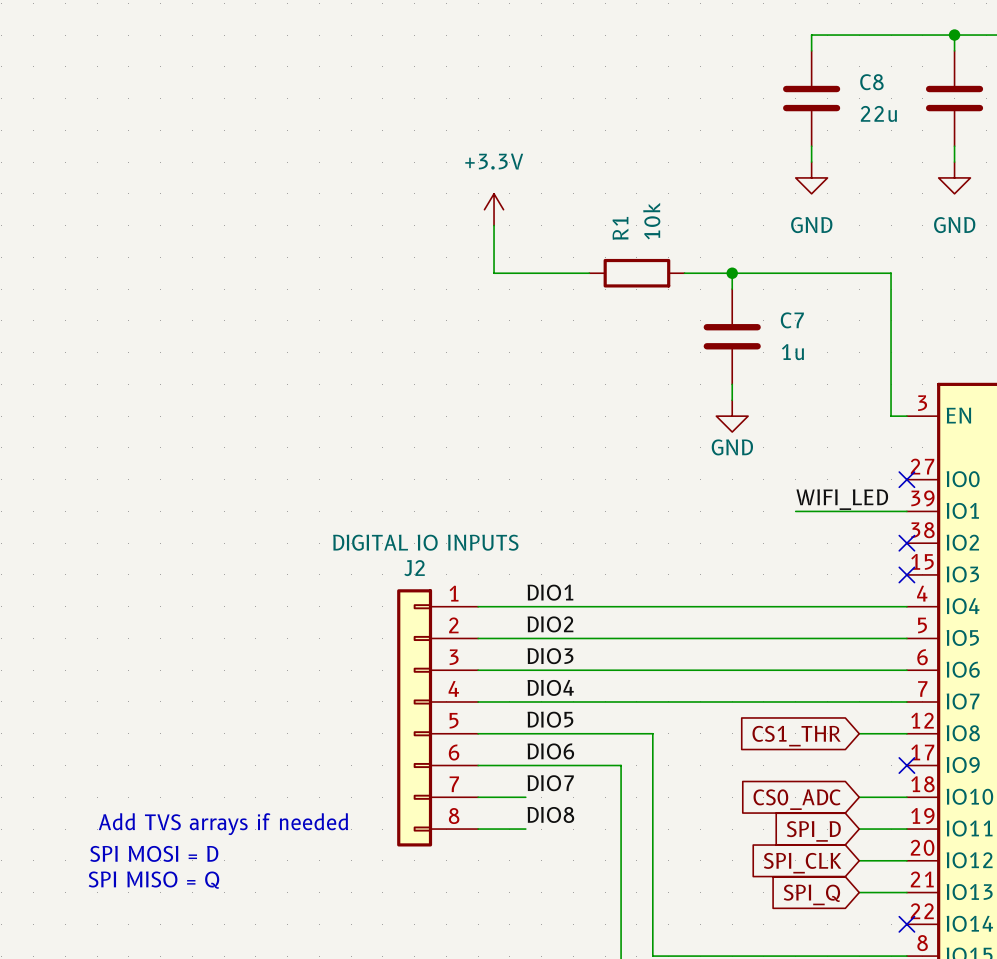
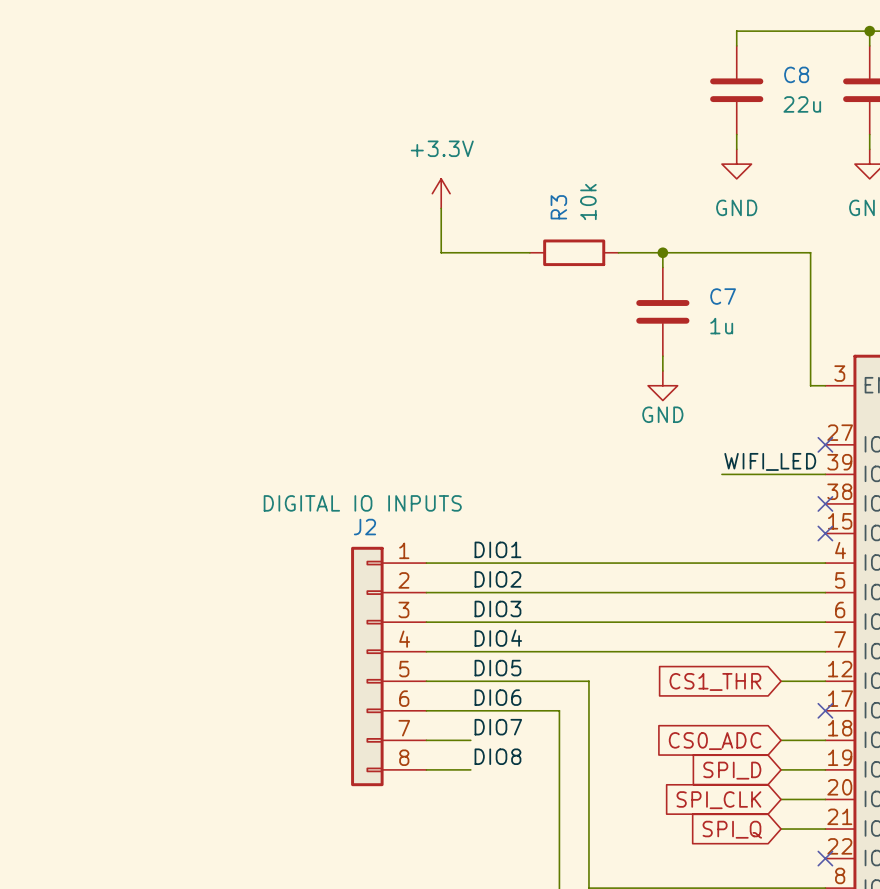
R1 name: R1 (620, 228) -> R3 (558, 207)
text: Add TVS arrays if needed (223, 824) -> none
text: SPI MOSI = D (154, 853) -> none
text: SPI MISO = Q (153, 880) -> none

